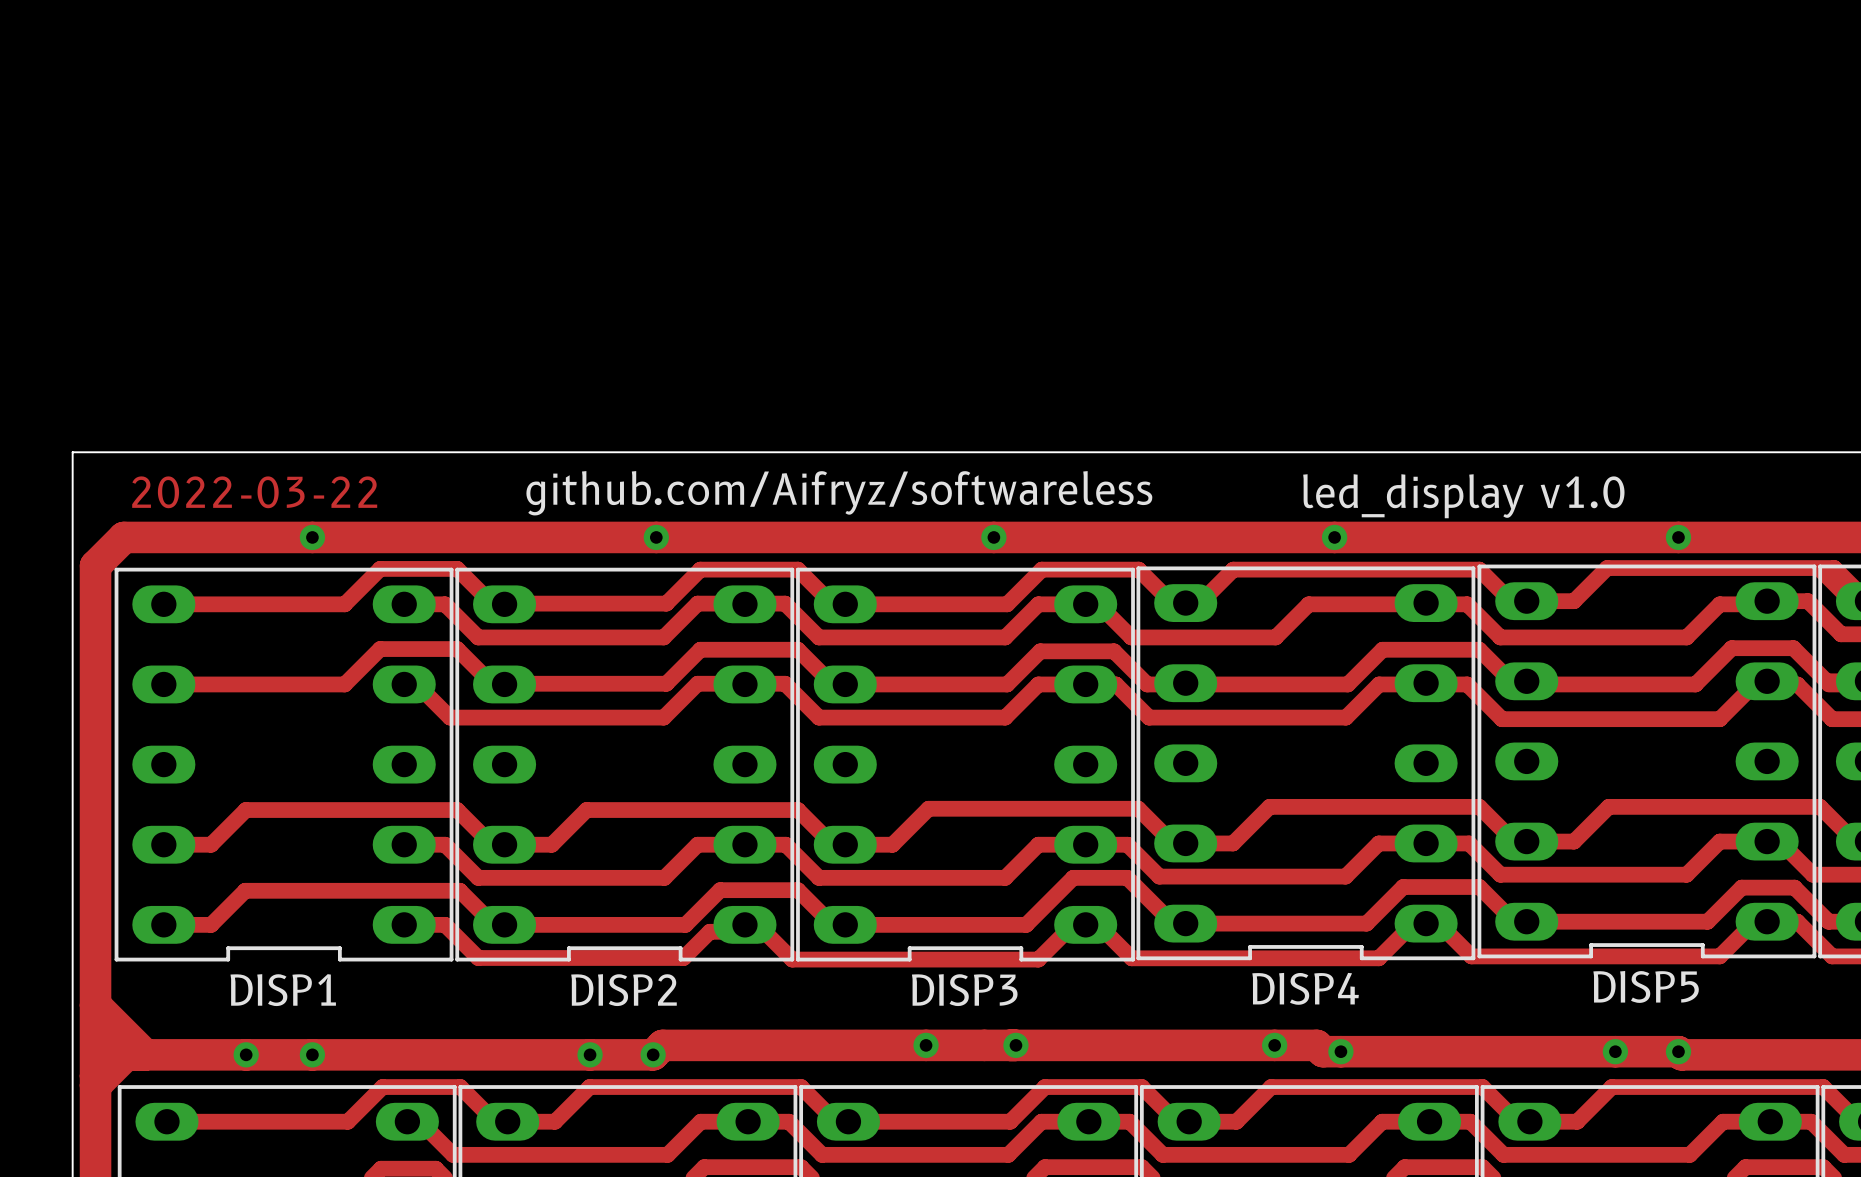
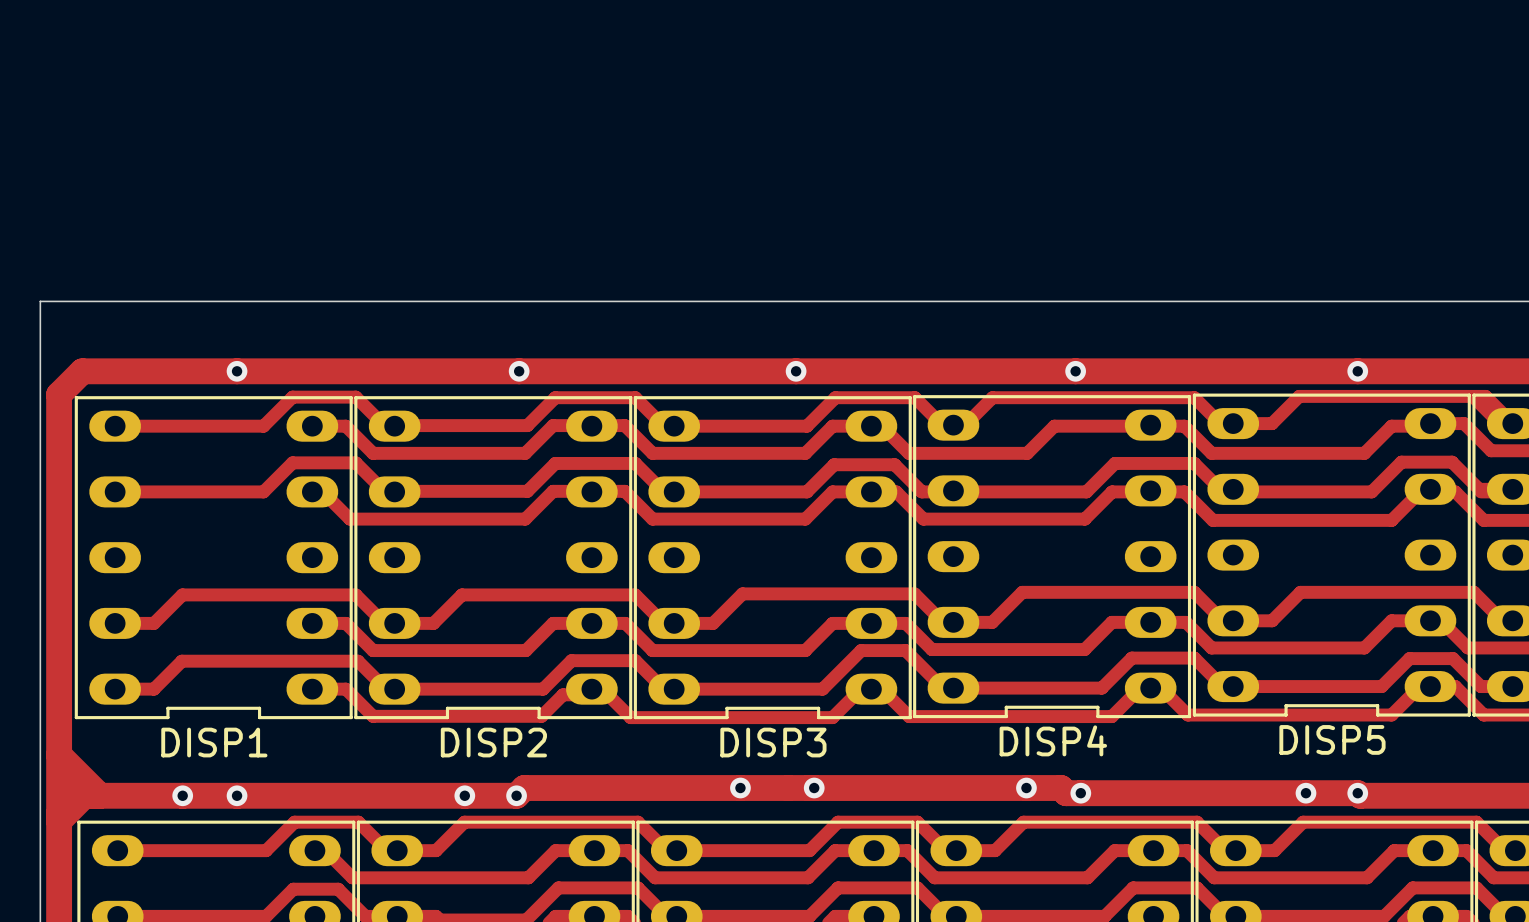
text: 2022-03-22 (254, 492) -> none
text: github.com/Aifryz/softwareless (839, 493) -> none
text: led_display v1.0 (1463, 496) -> none

